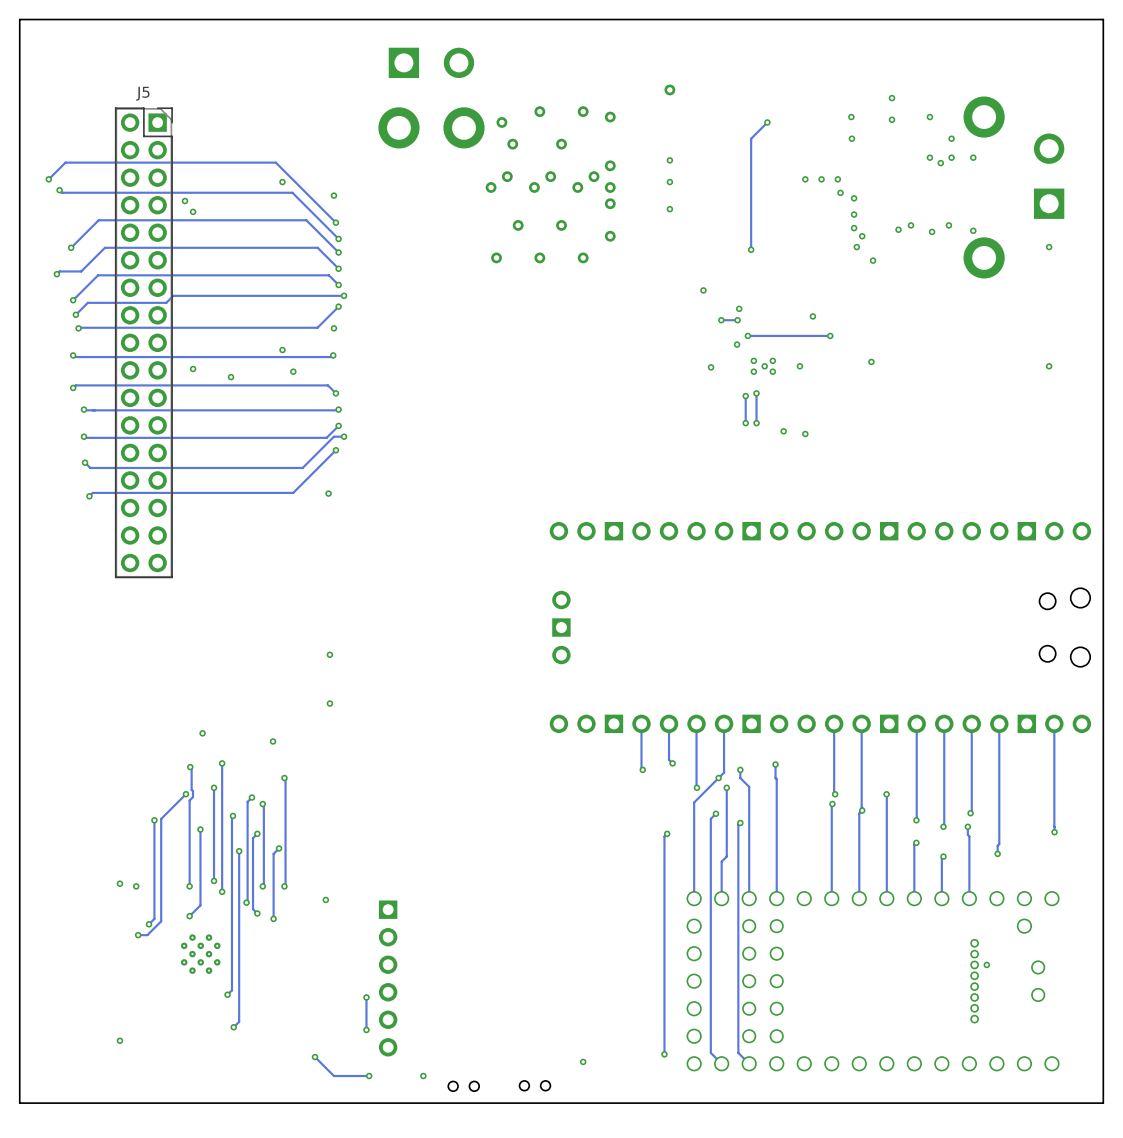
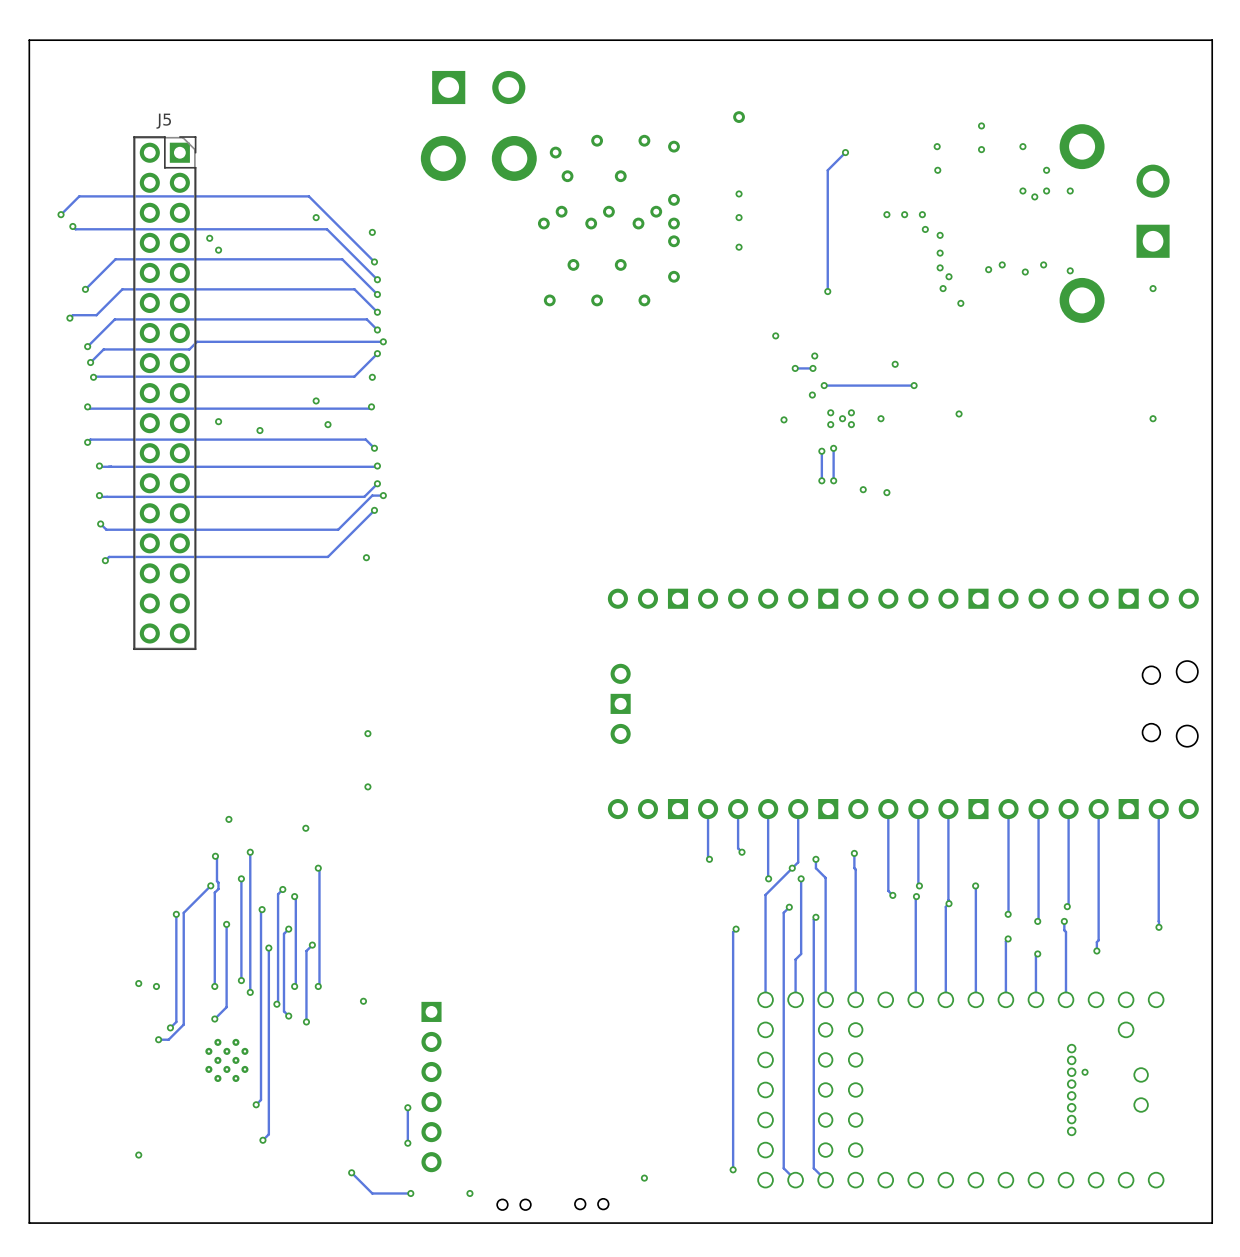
track: none -> (888, 809) (888, 890) (892, 895)
via: none -> (892, 895)

